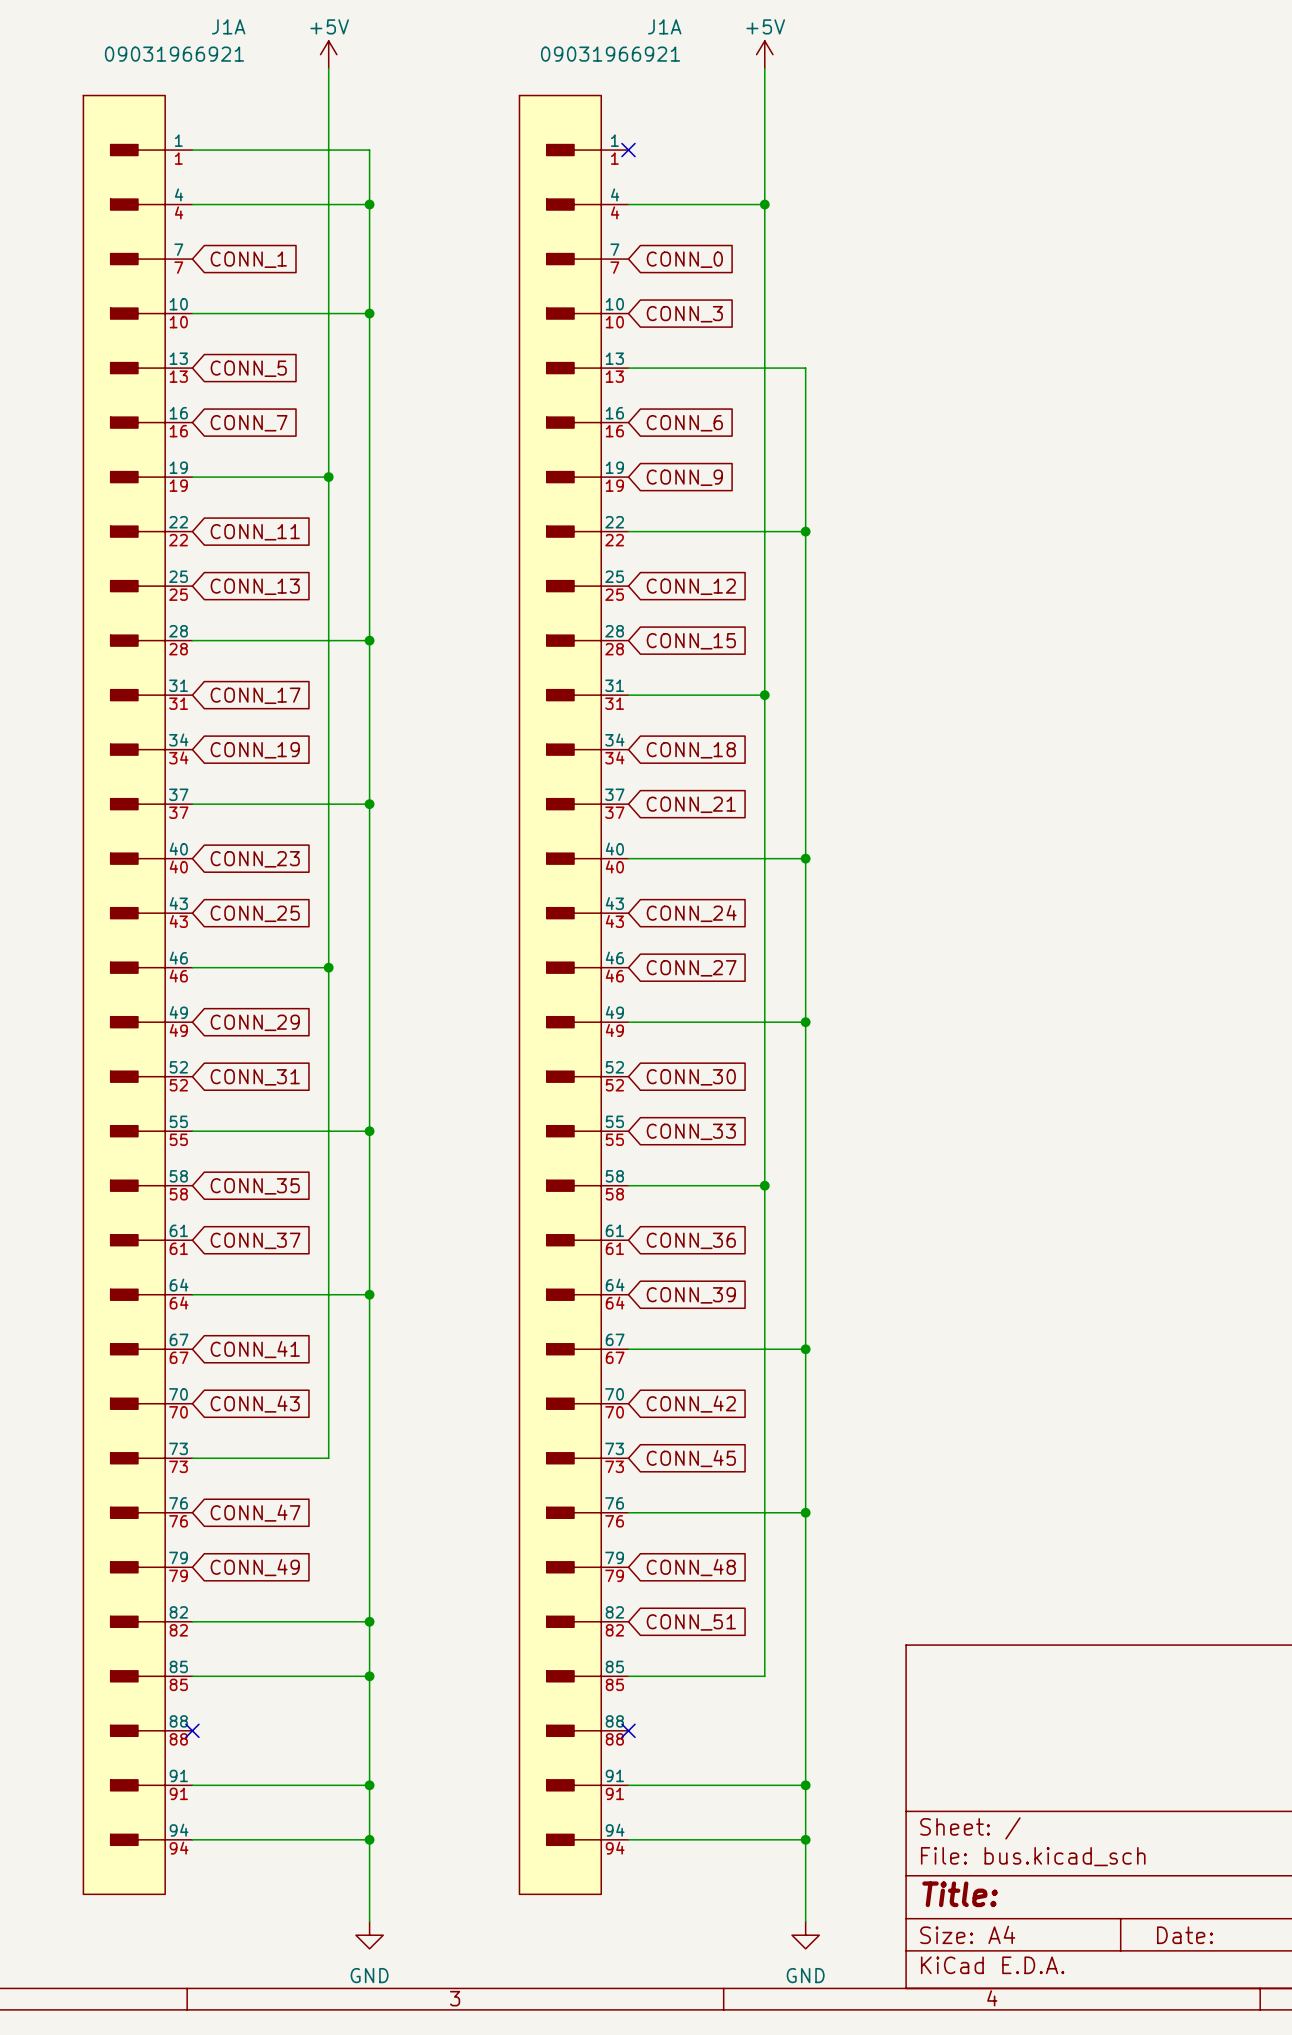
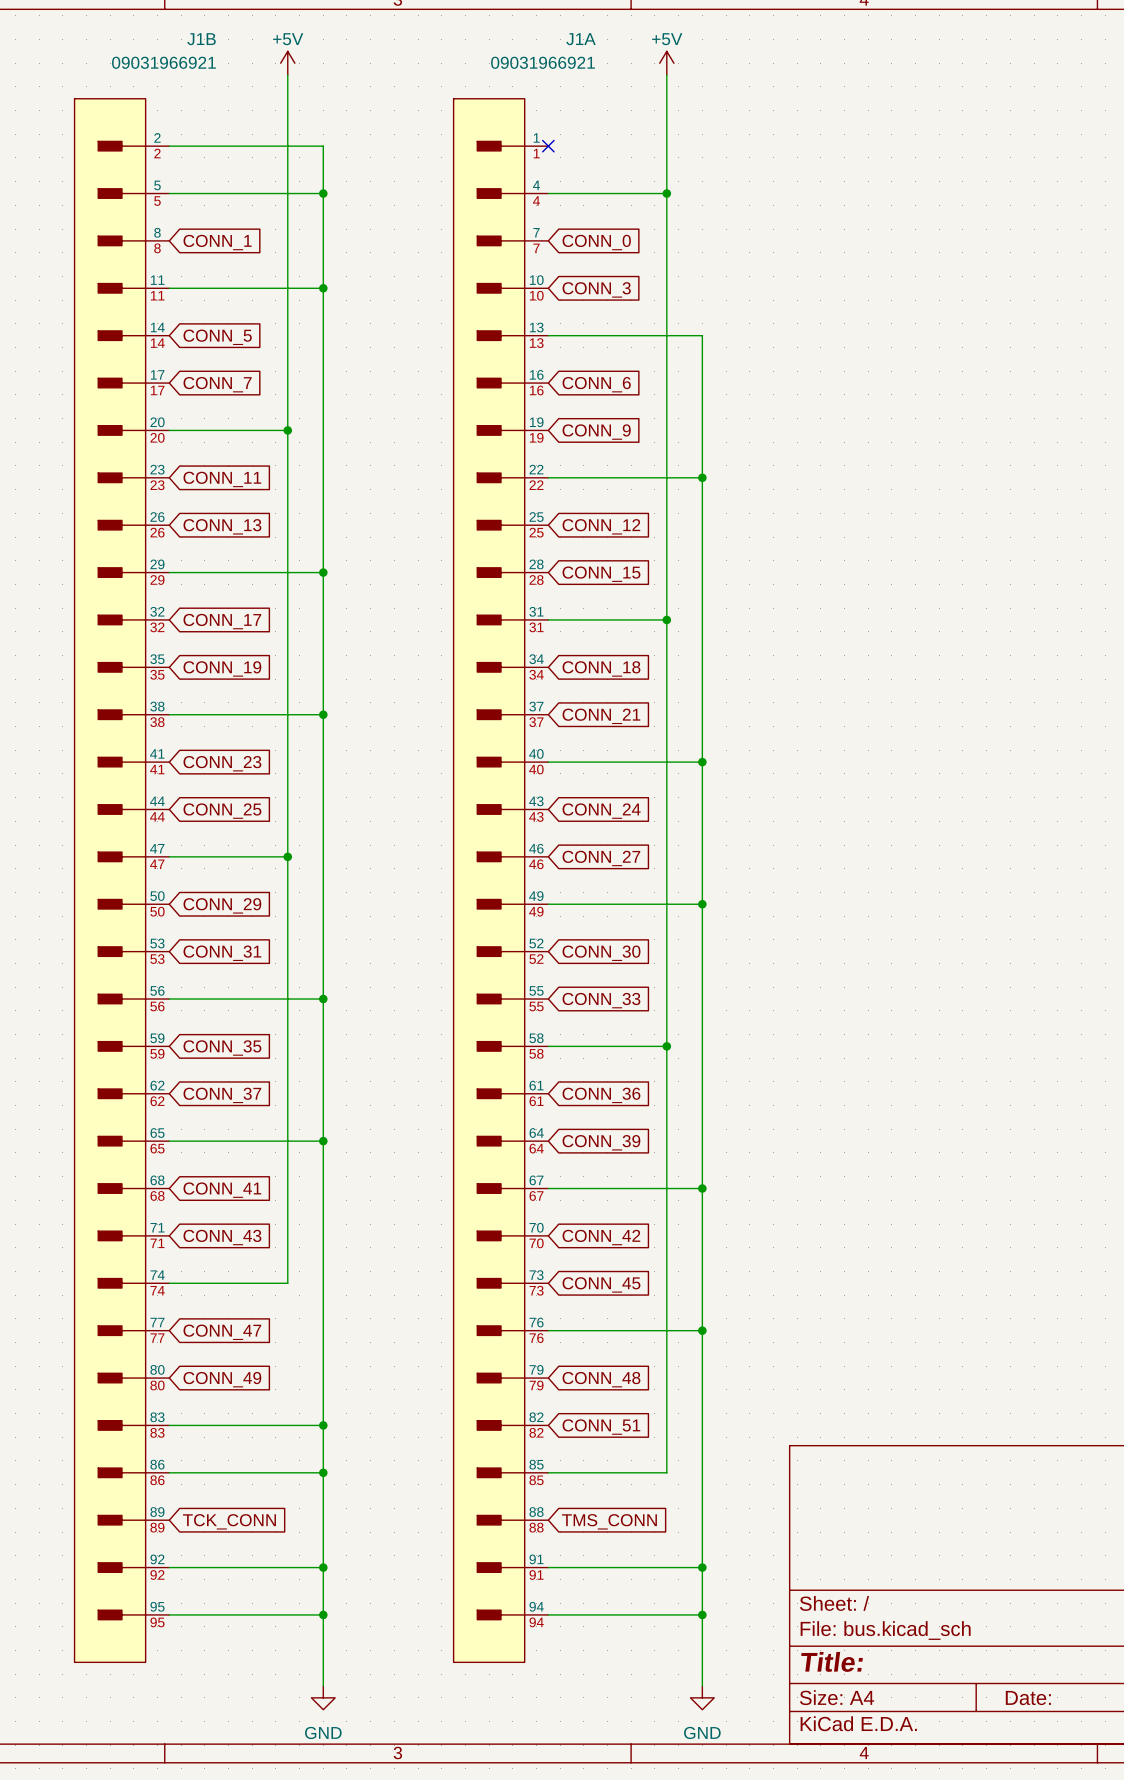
J1A name: J1A (228, 26) -> J1B (201, 39)
J1A symbol: [83, 95, 193, 1895] -> [74, 98, 170, 1663]
no-connect mark: (192, 1730) -> none
no-connect mark: (628, 1730) -> none
global label: none -> TCK_CONN (229, 1521)
global label: none -> TMS_CONN (609, 1521)

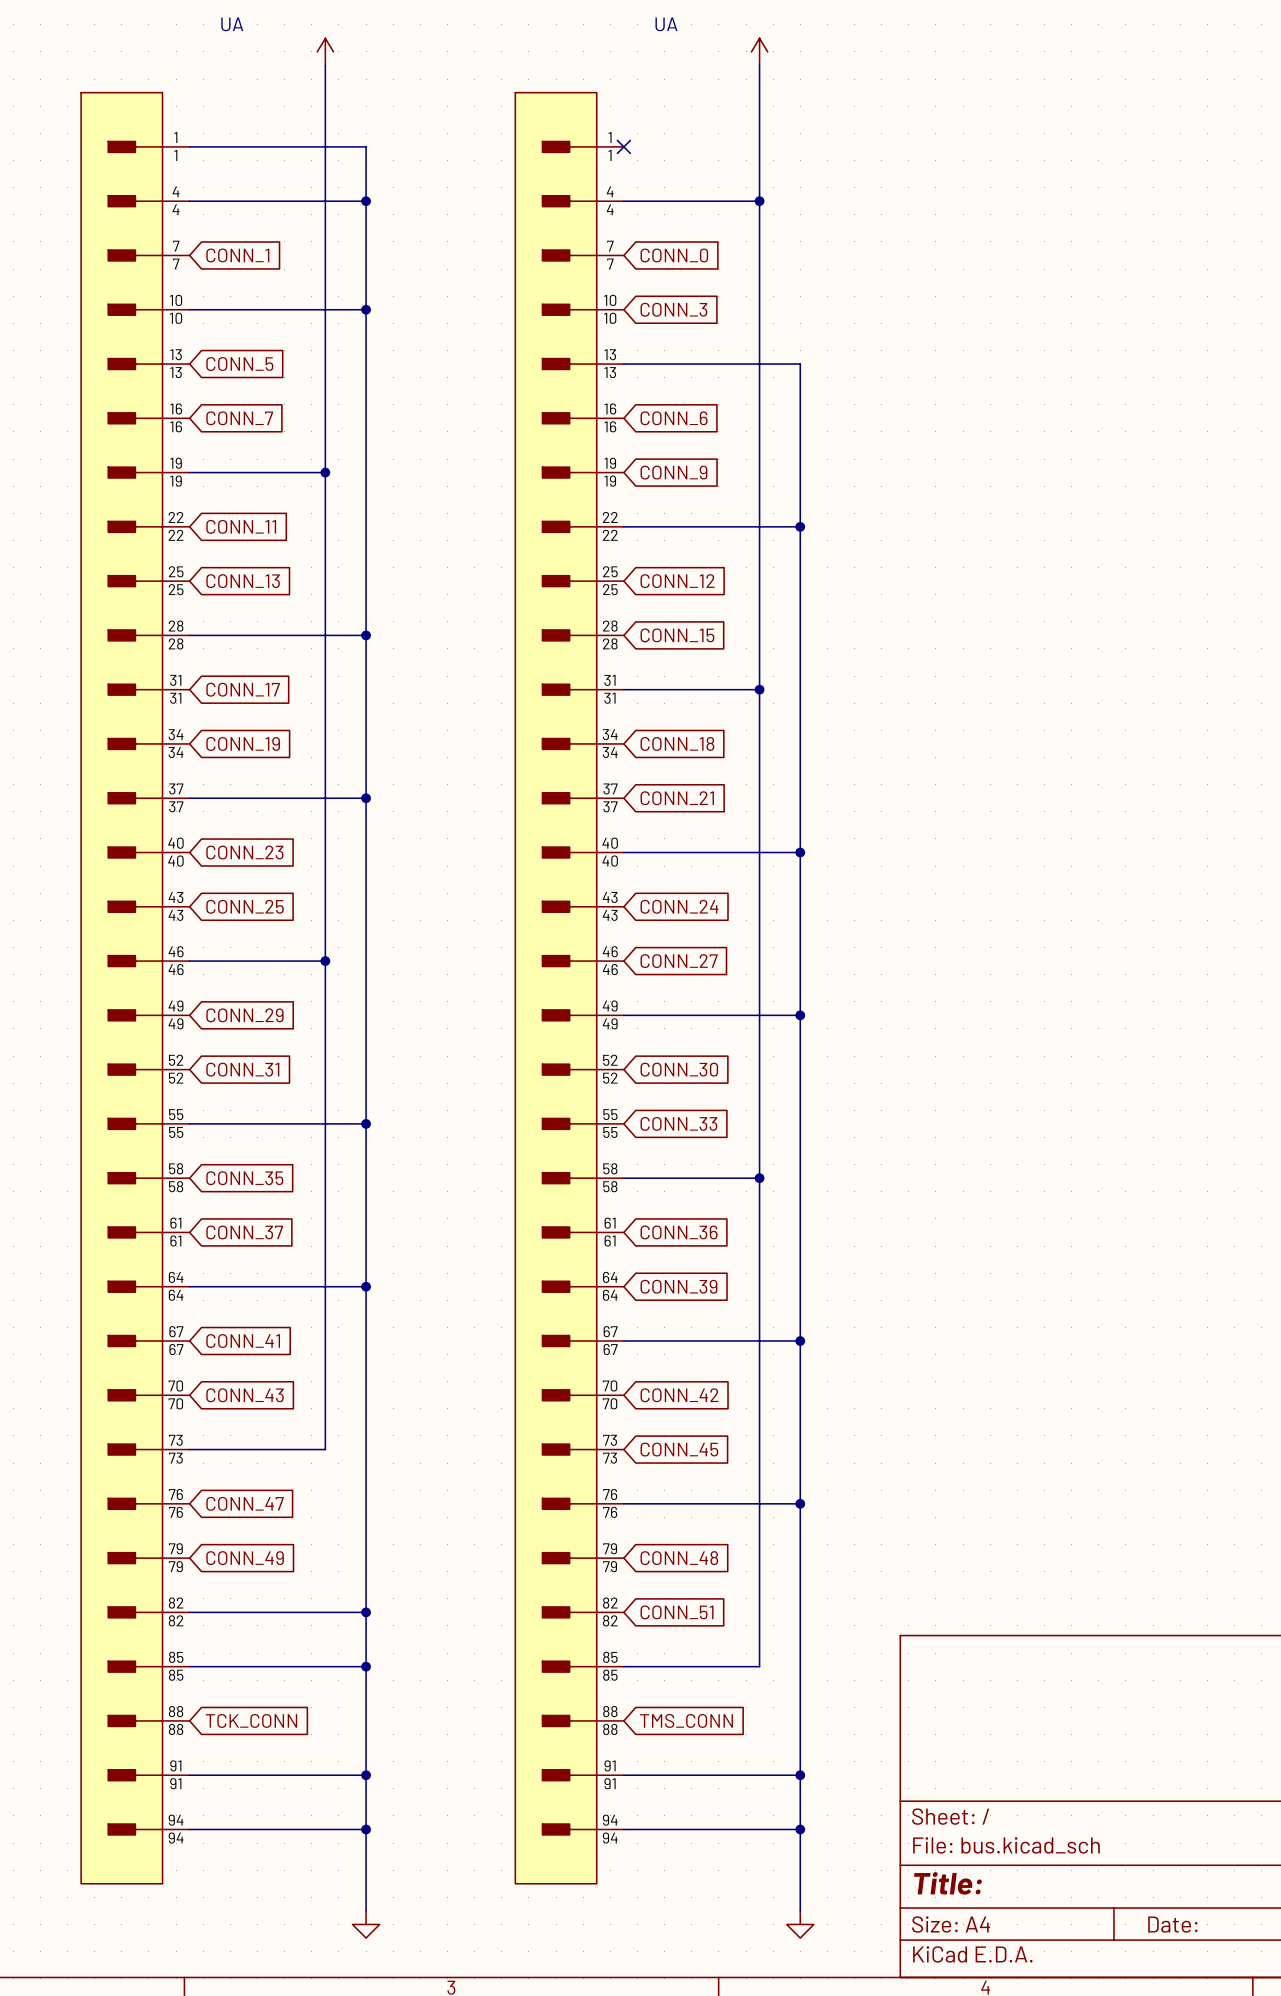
J1B name: J1B (201, 39) -> UA (232, 24)
power symbol text: +5V (288, 39) -> none
J1A name: J1A (581, 39) -> UA (666, 24)
power symbol text: +5V (667, 39) -> none
J1B value: 09031966921 (163, 62) -> none
J1A value: 09031966921 (542, 62) -> none
J1B symbol: [74, 98, 170, 1663] -> [81, 92, 190, 1884]
power symbol text: GND (323, 1732) -> none
power symbol text: GND (702, 1732) -> none

